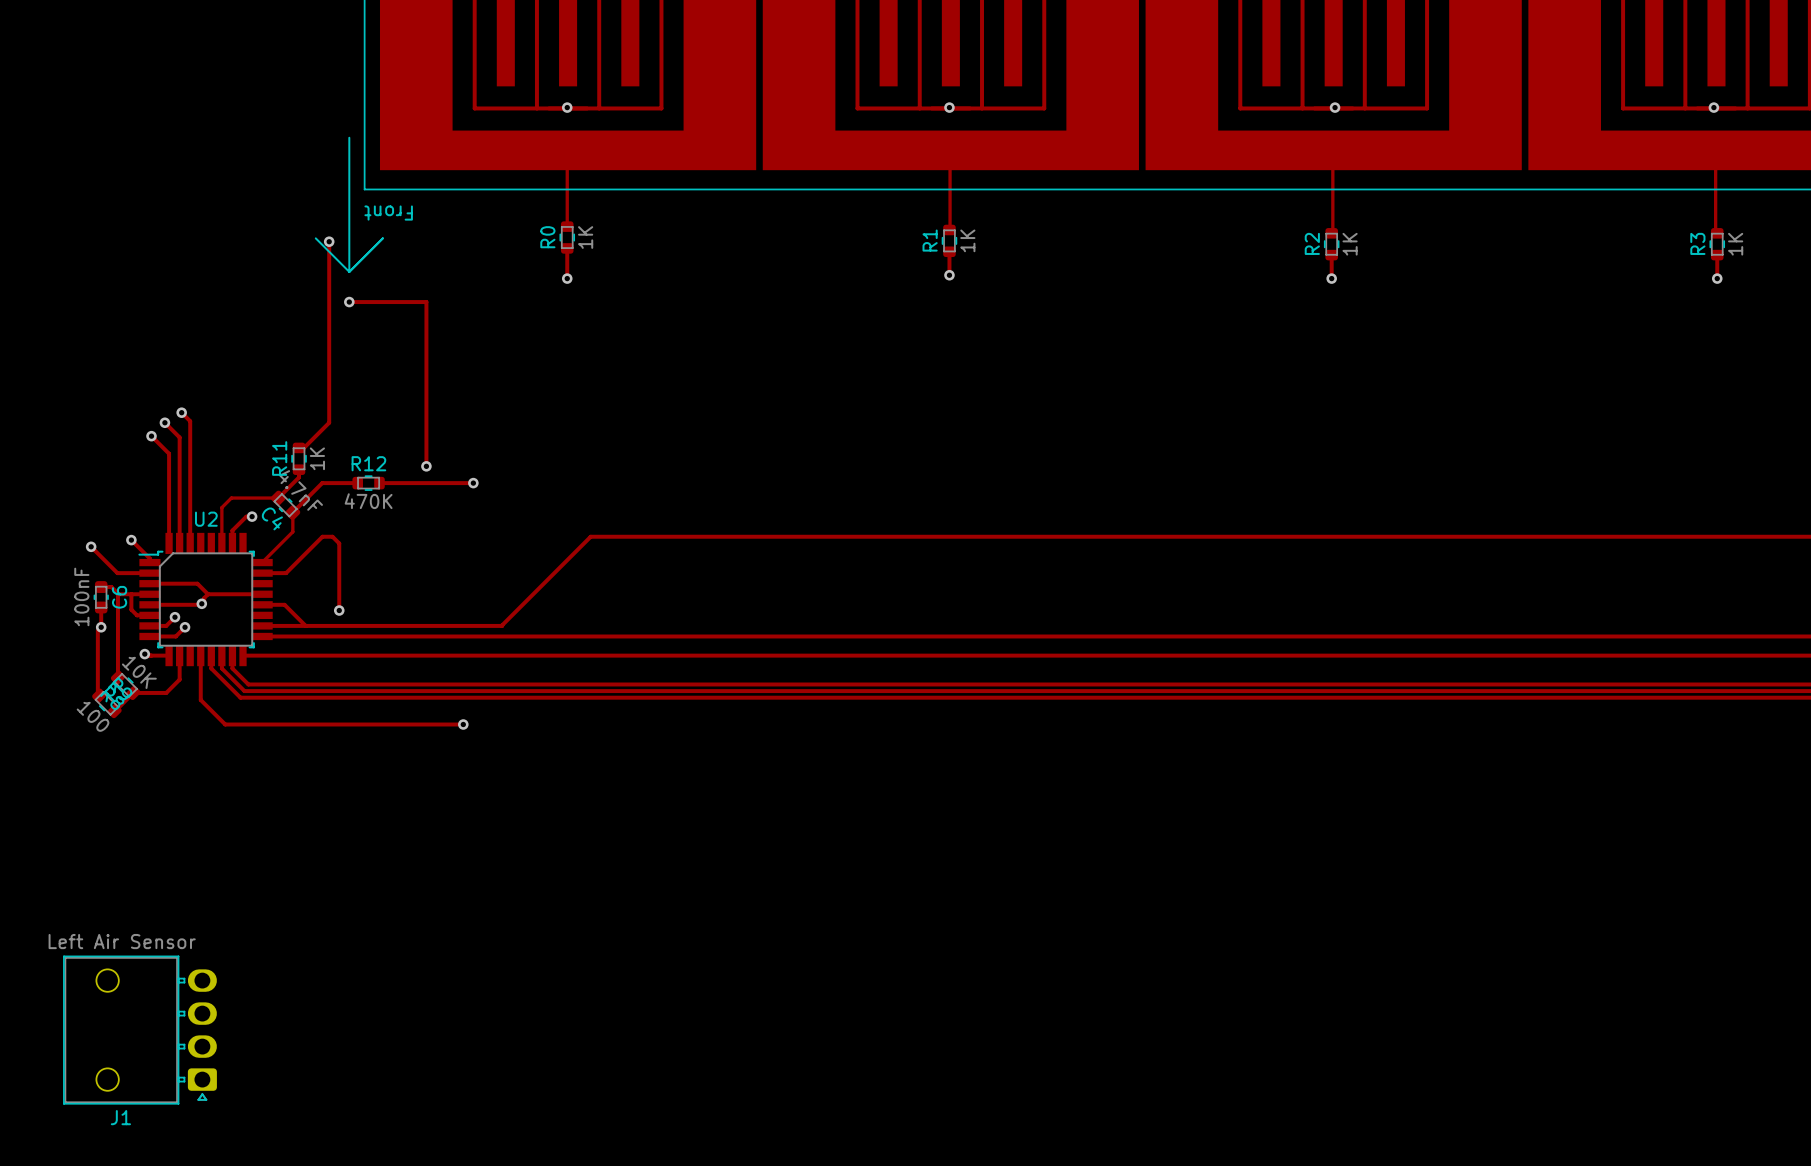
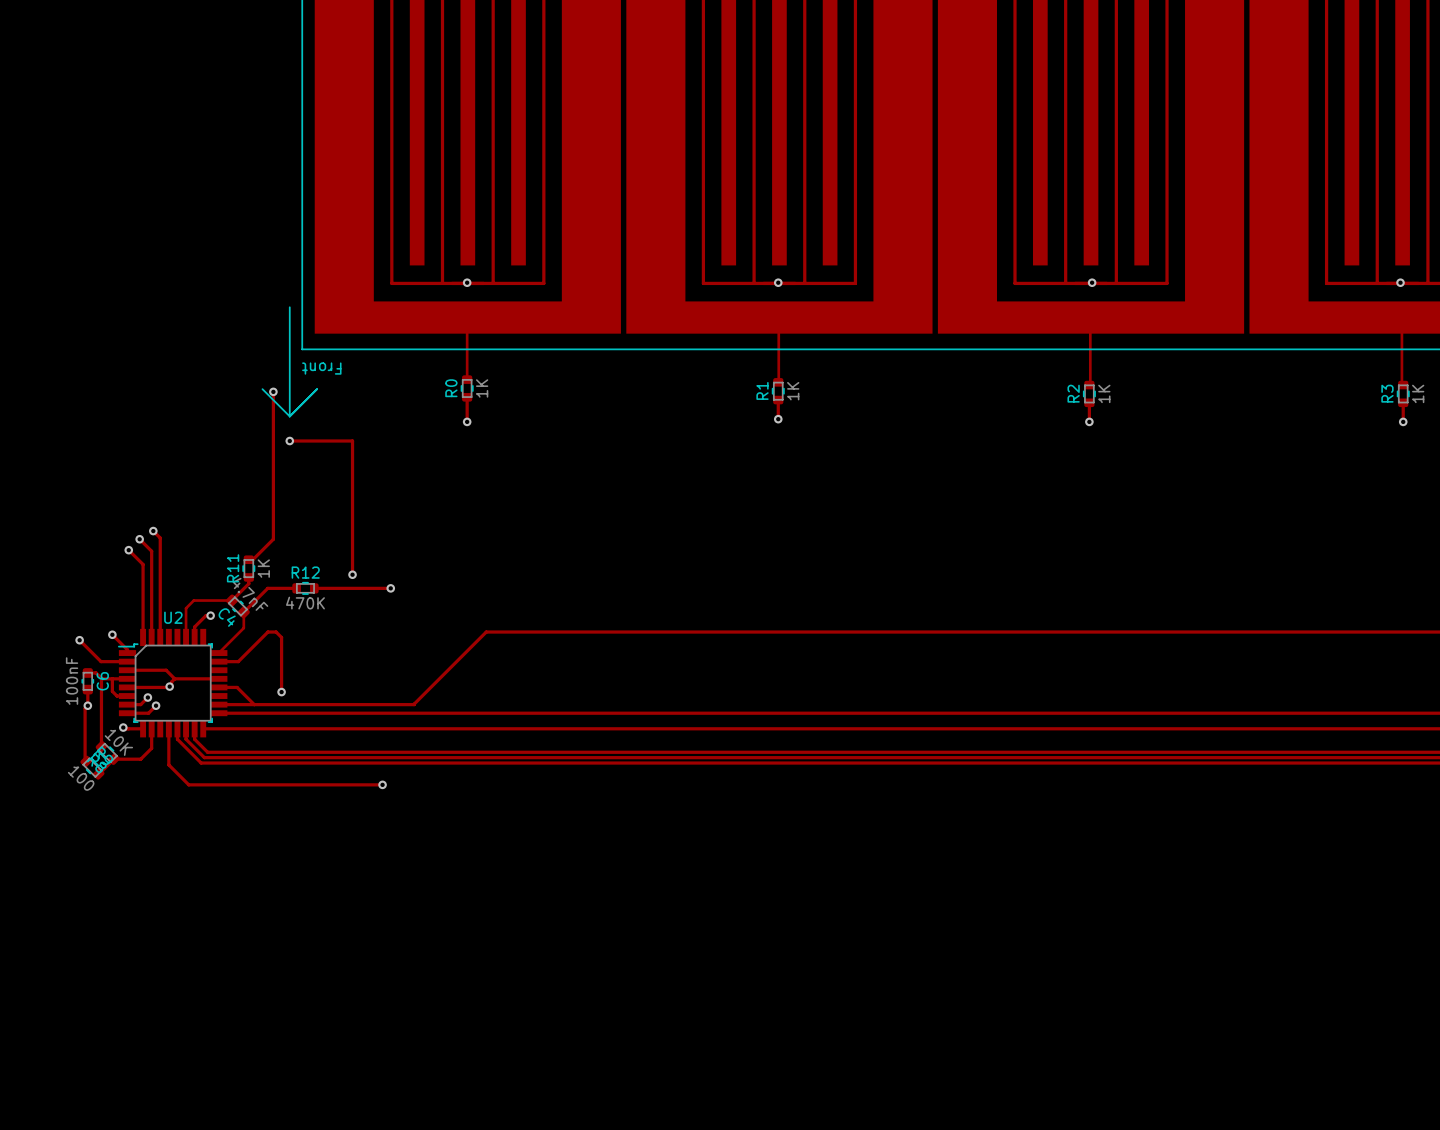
J1: Left Air Sensor (140, 1030) -> none

